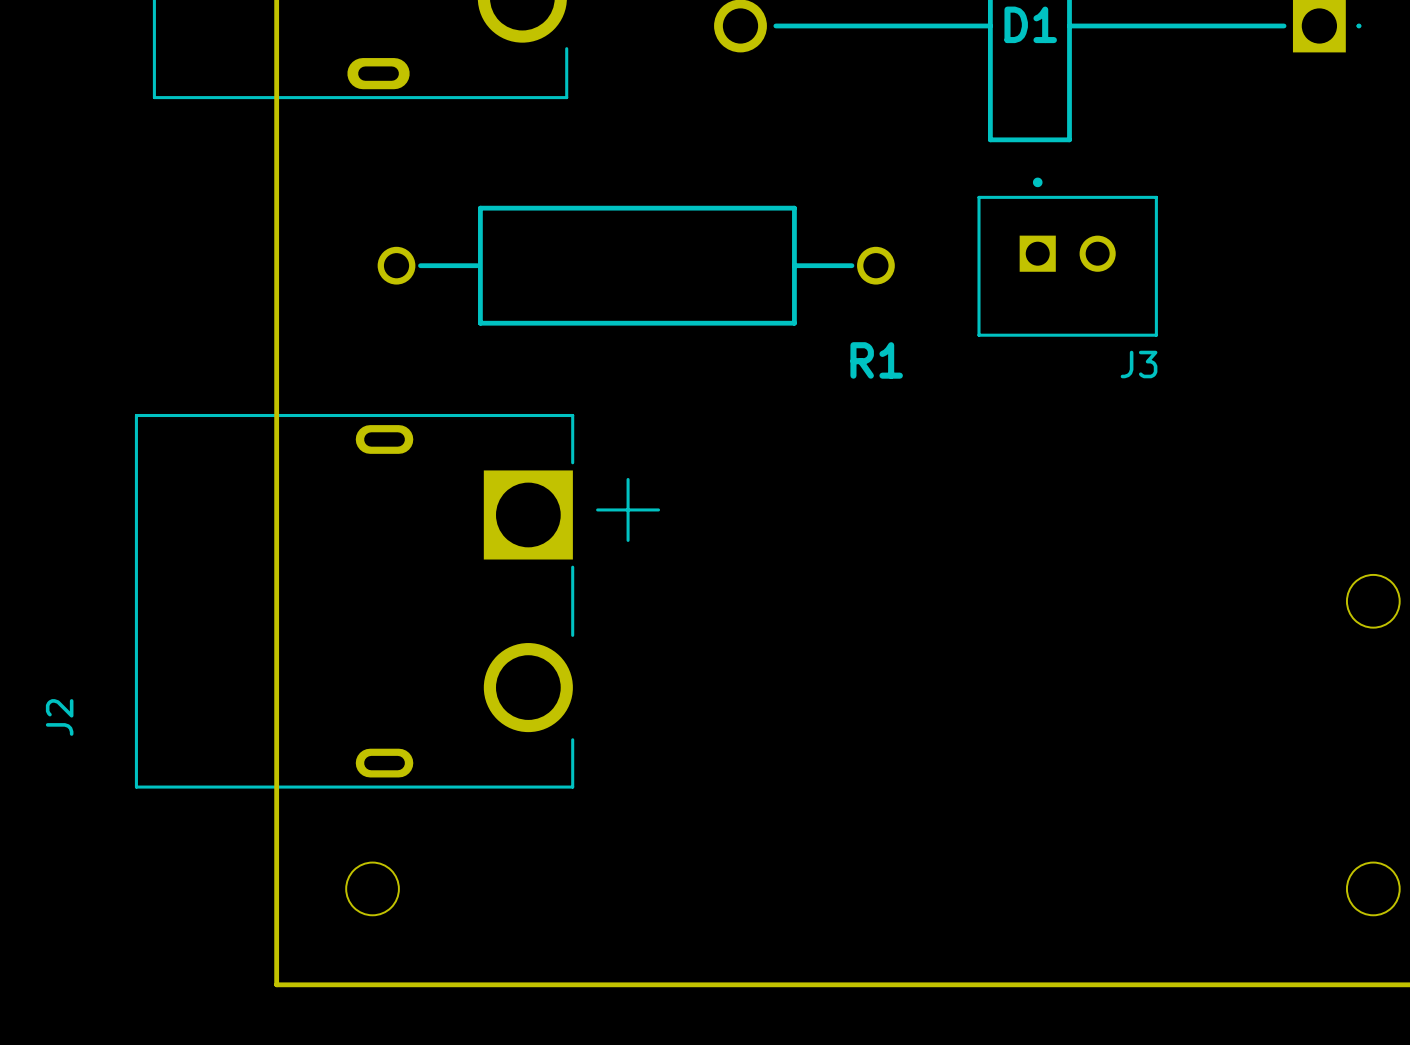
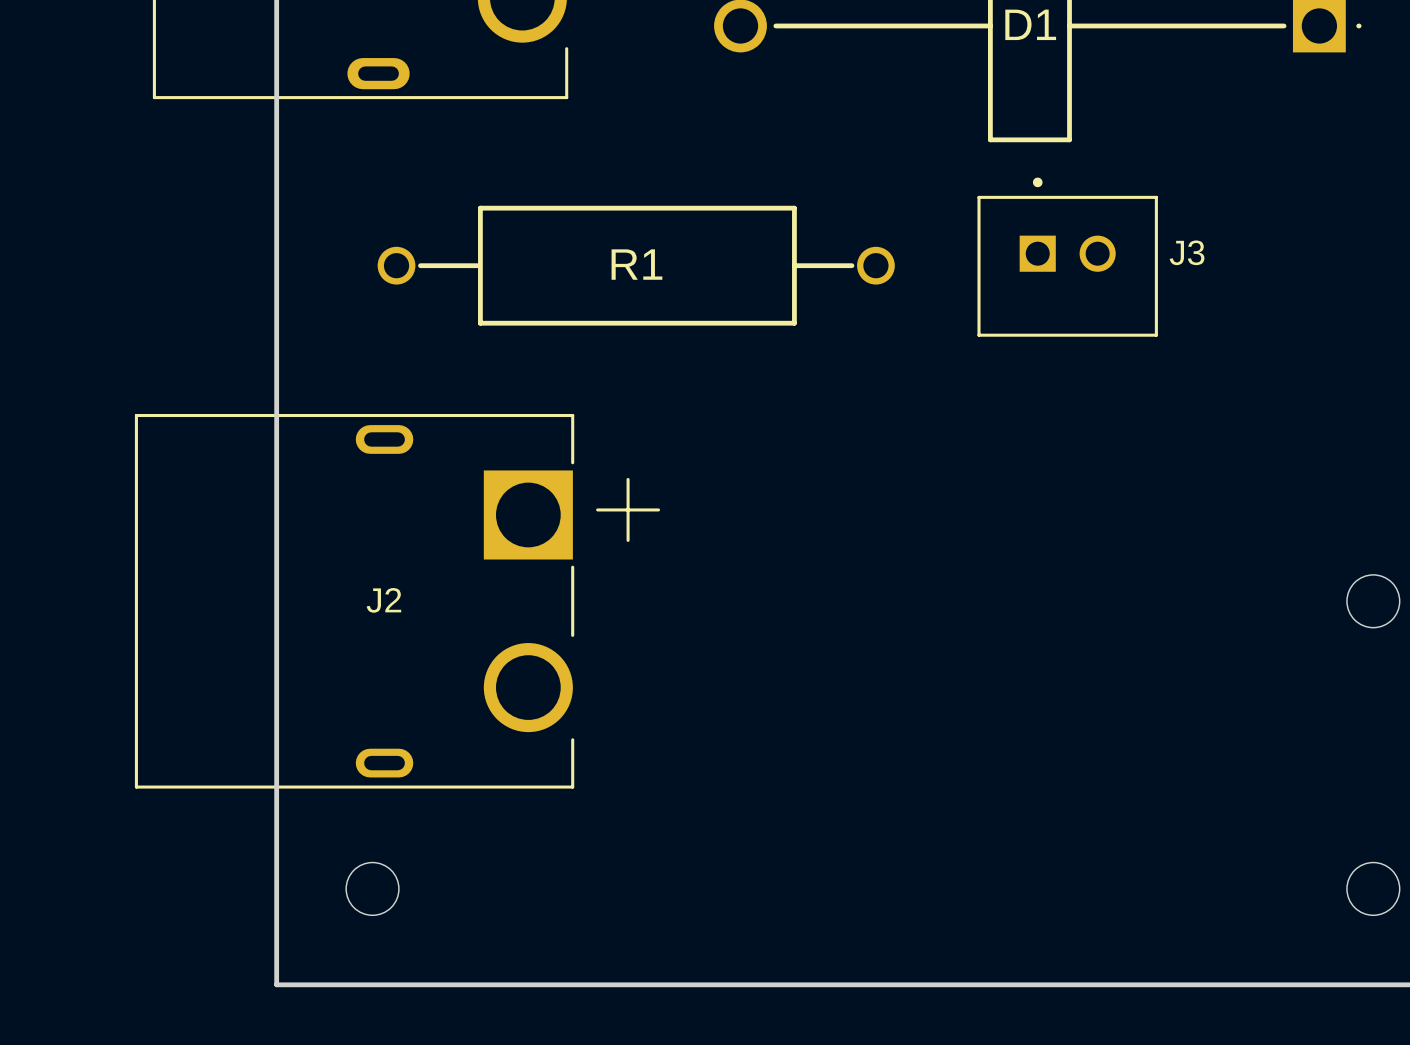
R1 name position: R1 (876, 360) -> R1 (636, 264)
J3 name position: J3 (1139, 364) -> J3 (1187, 252)
J2 name rotation: 0° (59, 717) -> 90° clockwise (383, 600)
J2 name position: J2 (59, 717) -> J2 (383, 600)

